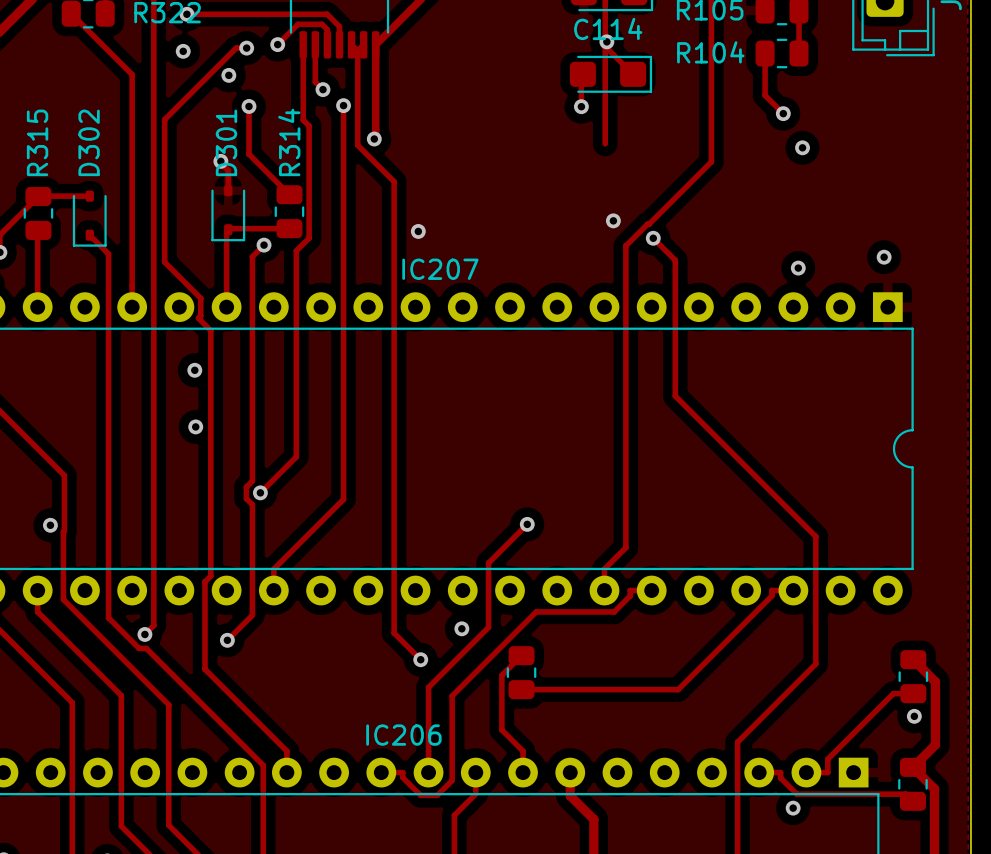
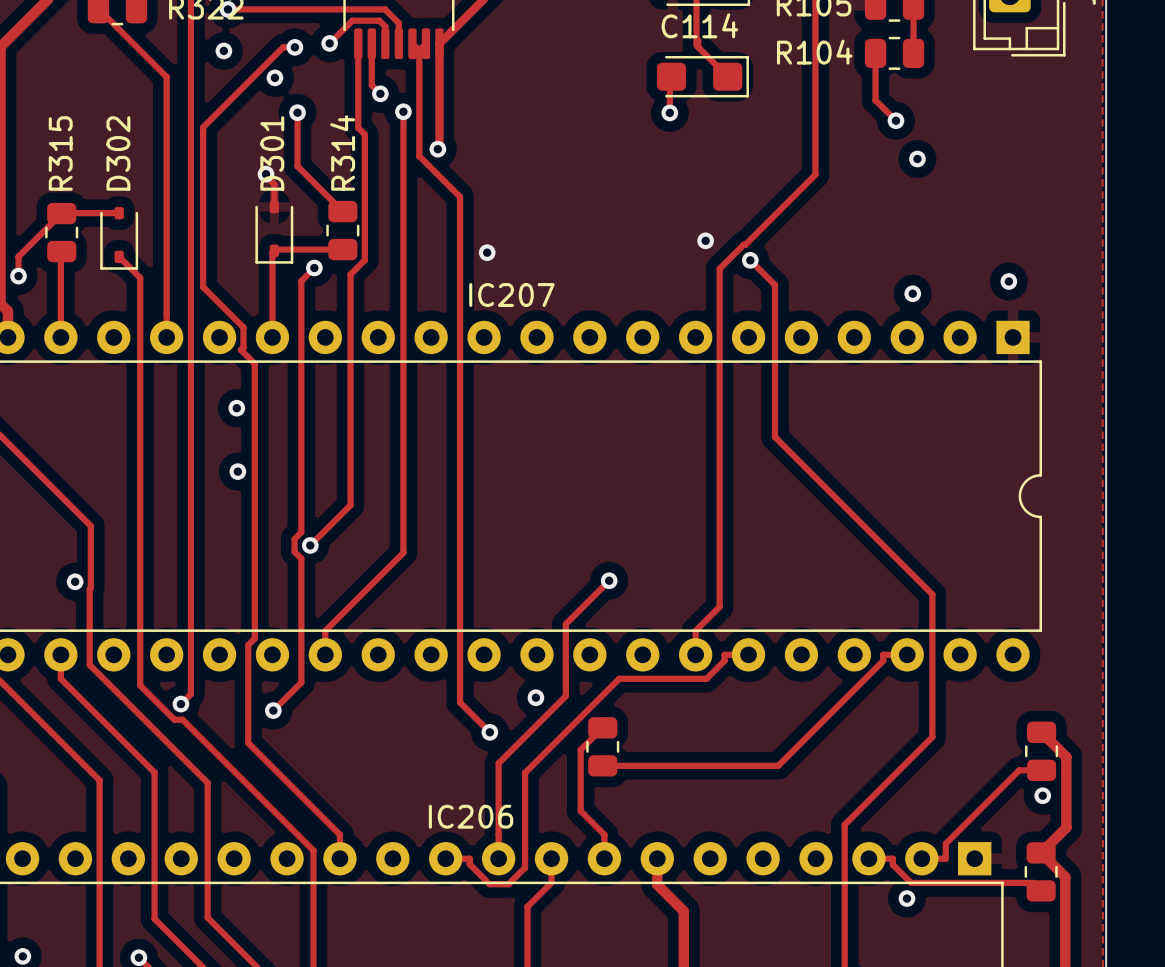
via: (606, 41) -> none
track: (605, 46) (605, 143) -> none

